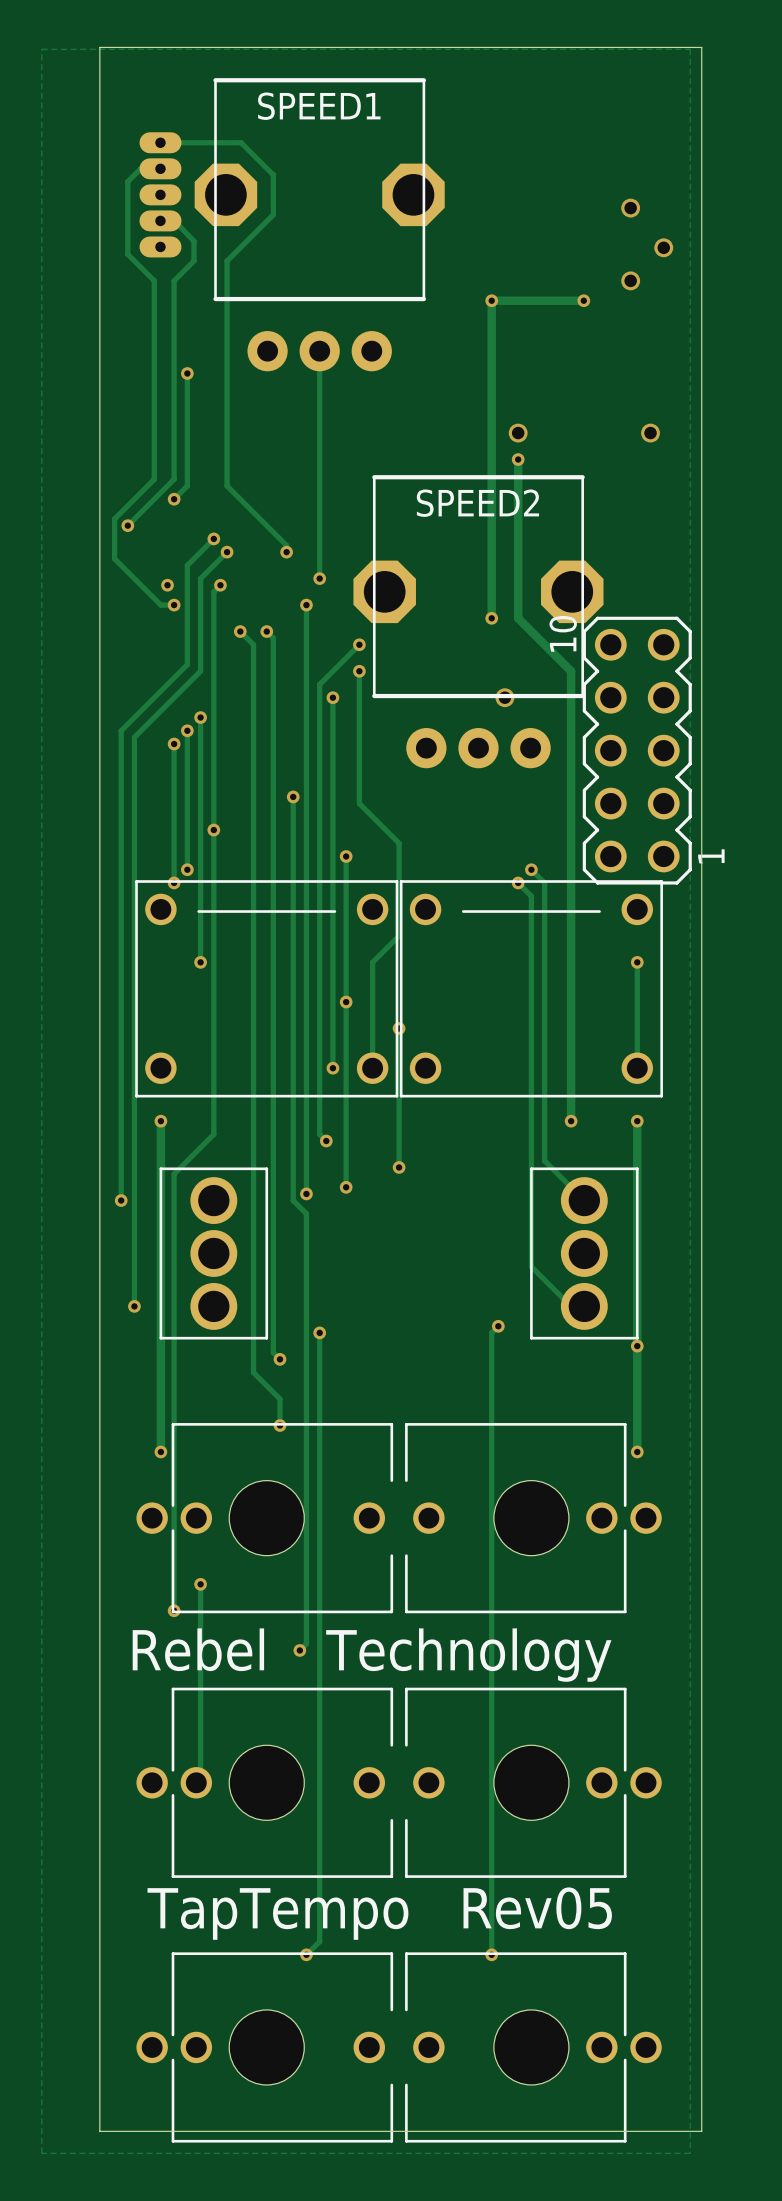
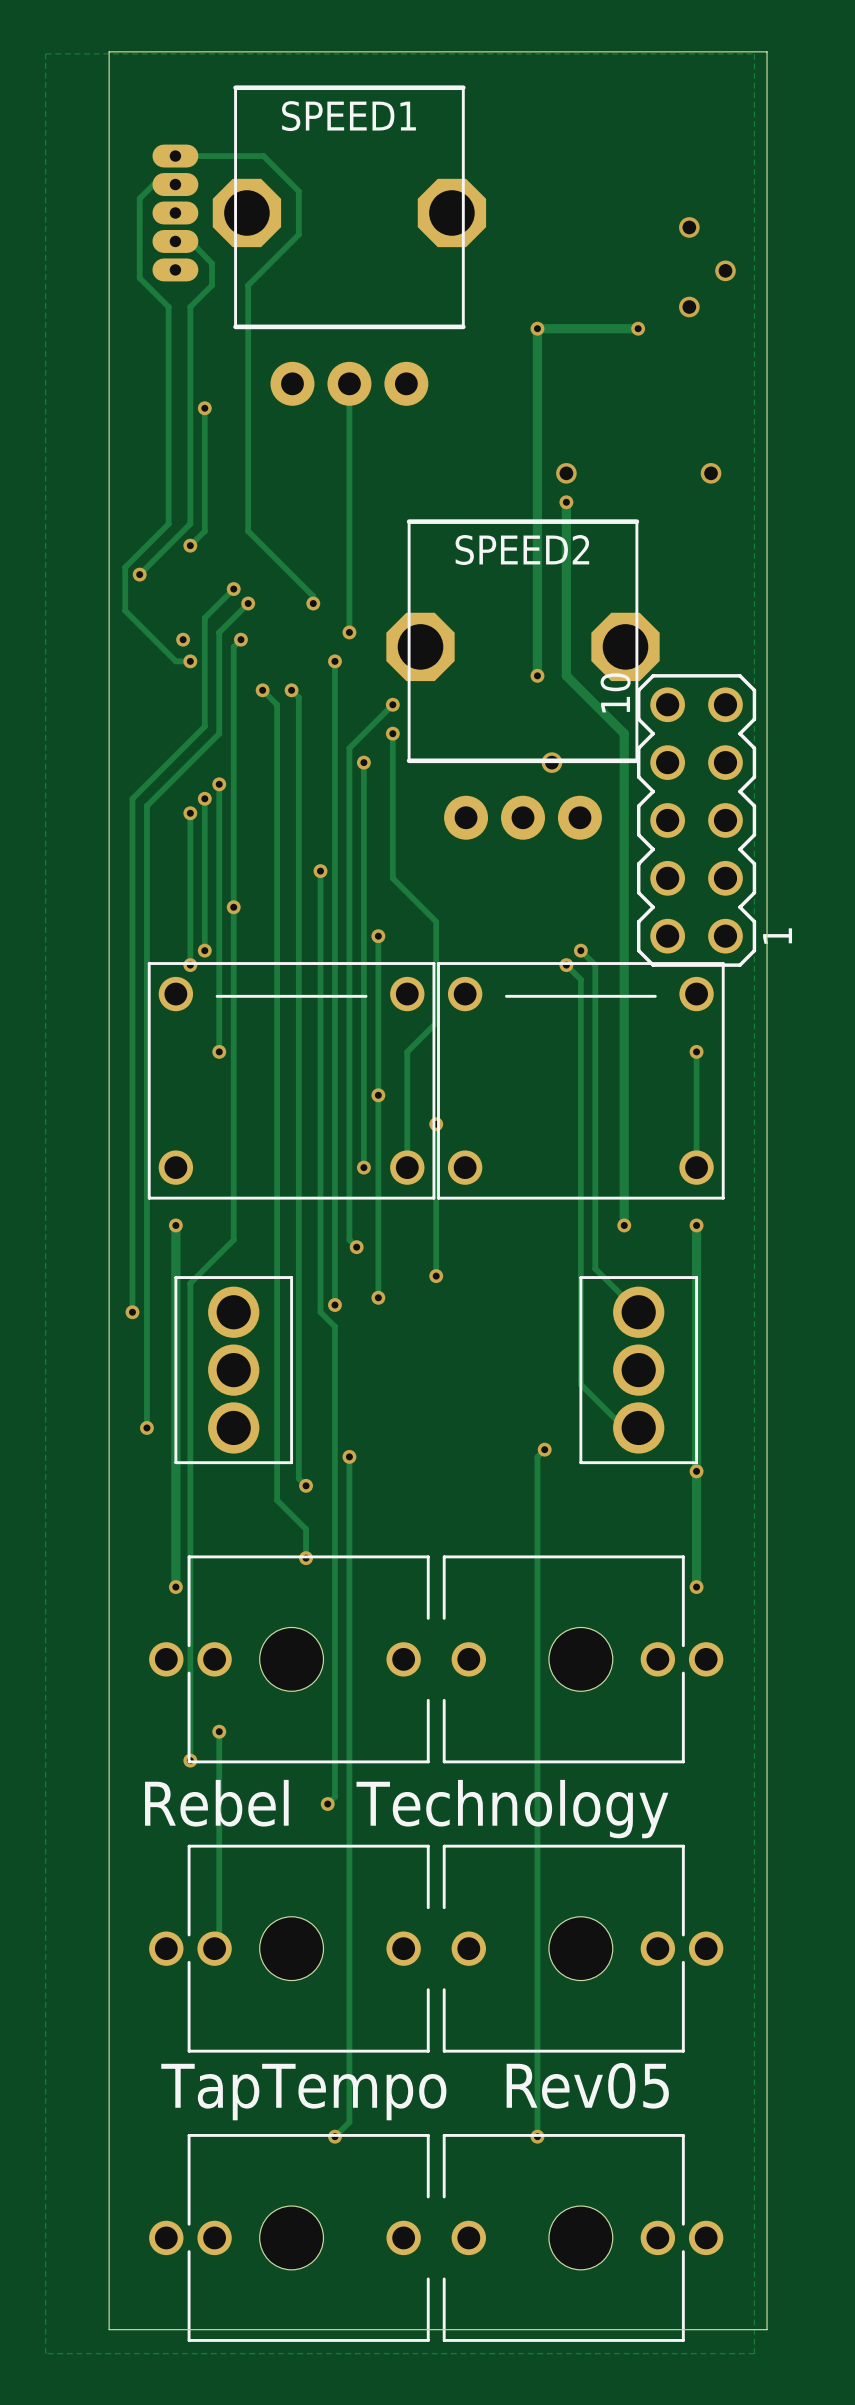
part footprint: [136, 1423, 394, 1614] -> [149, 1555, 430, 1764]
part footprint: [405, 1423, 662, 1614] -> [442, 1555, 724, 1764]
part footprint: [136, 1687, 394, 1878] -> [149, 1844, 430, 2053]
part footprint: [405, 1687, 662, 1878] -> [442, 1844, 724, 2053]
part footprint: [136, 1952, 394, 2143] -> [149, 2134, 430, 2342]
part footprint: [405, 1952, 662, 2143] -> [442, 2134, 724, 2342]

